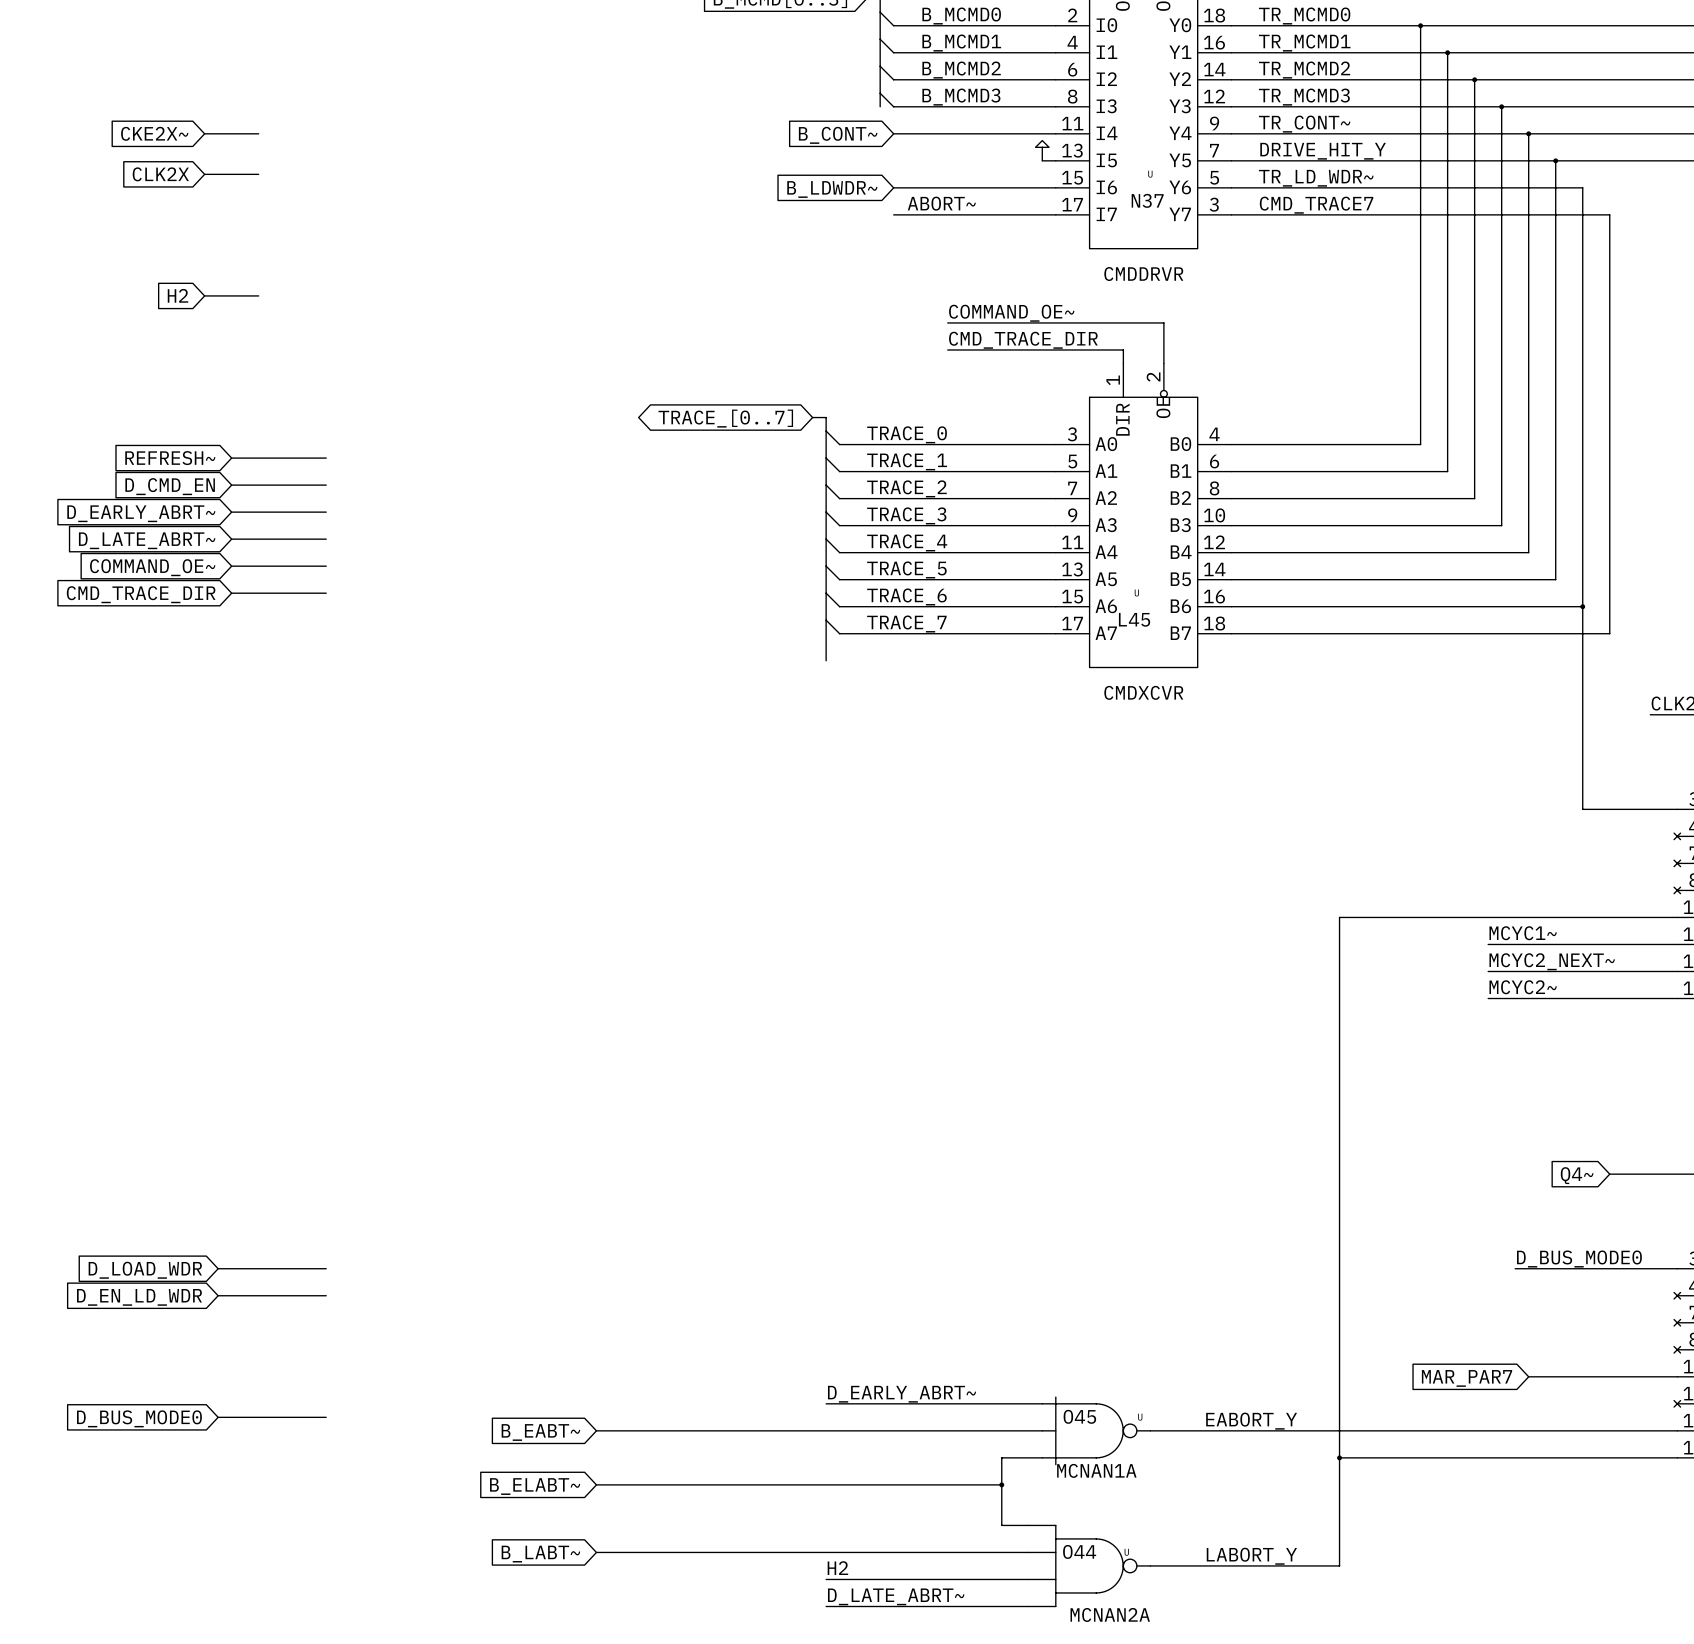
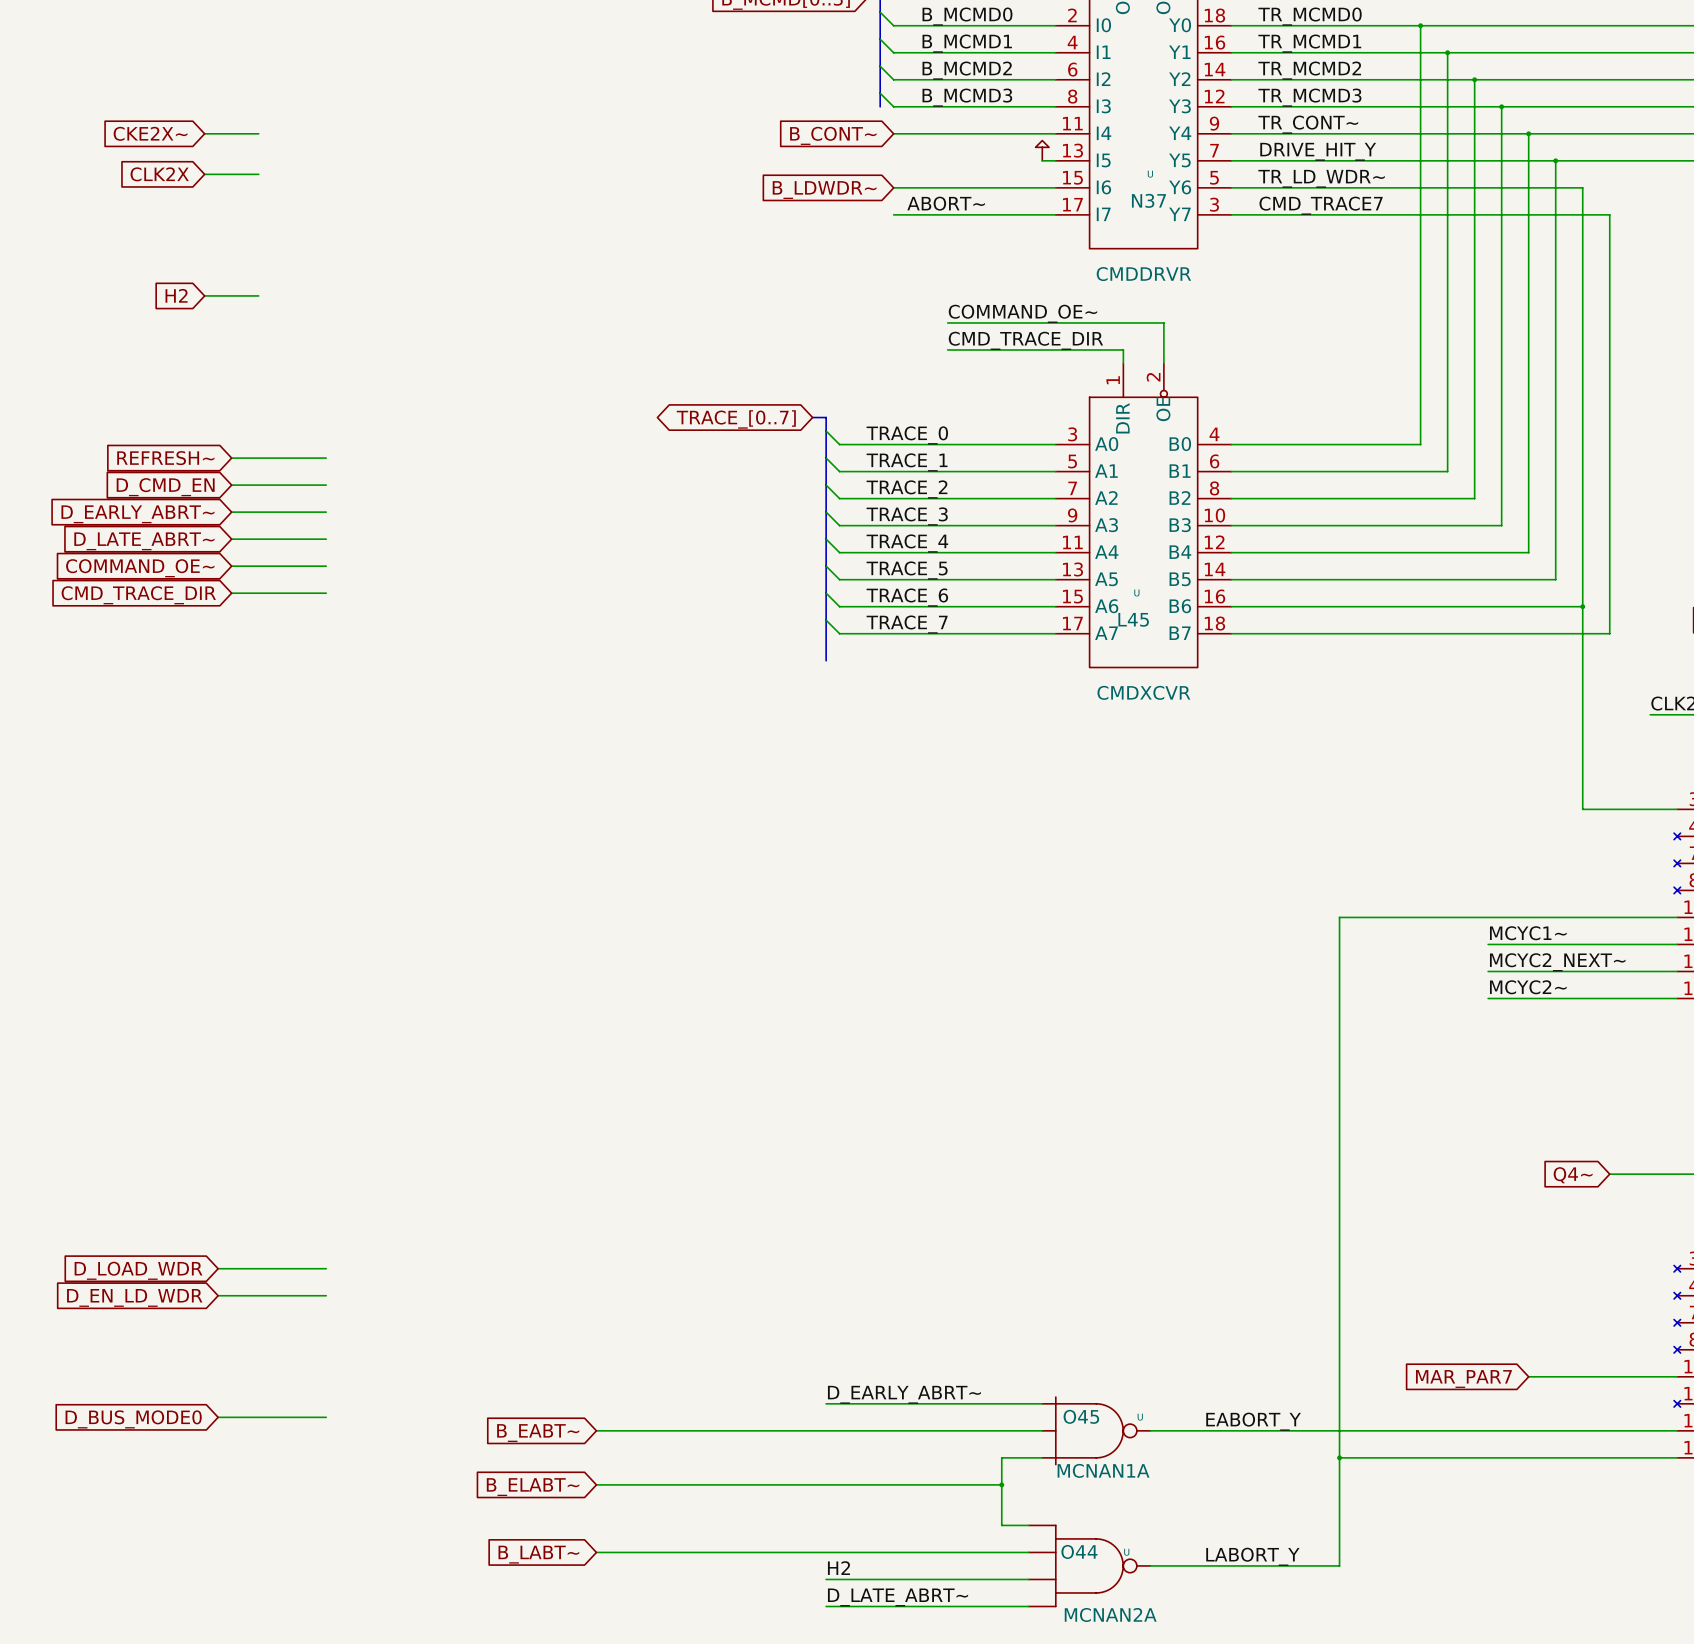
label: D_BUS_MODE0 (1579, 1259) -> none
wire: (1515, 1268) (1677, 1268) -> none
no-connect mark: none -> (1677, 1268)

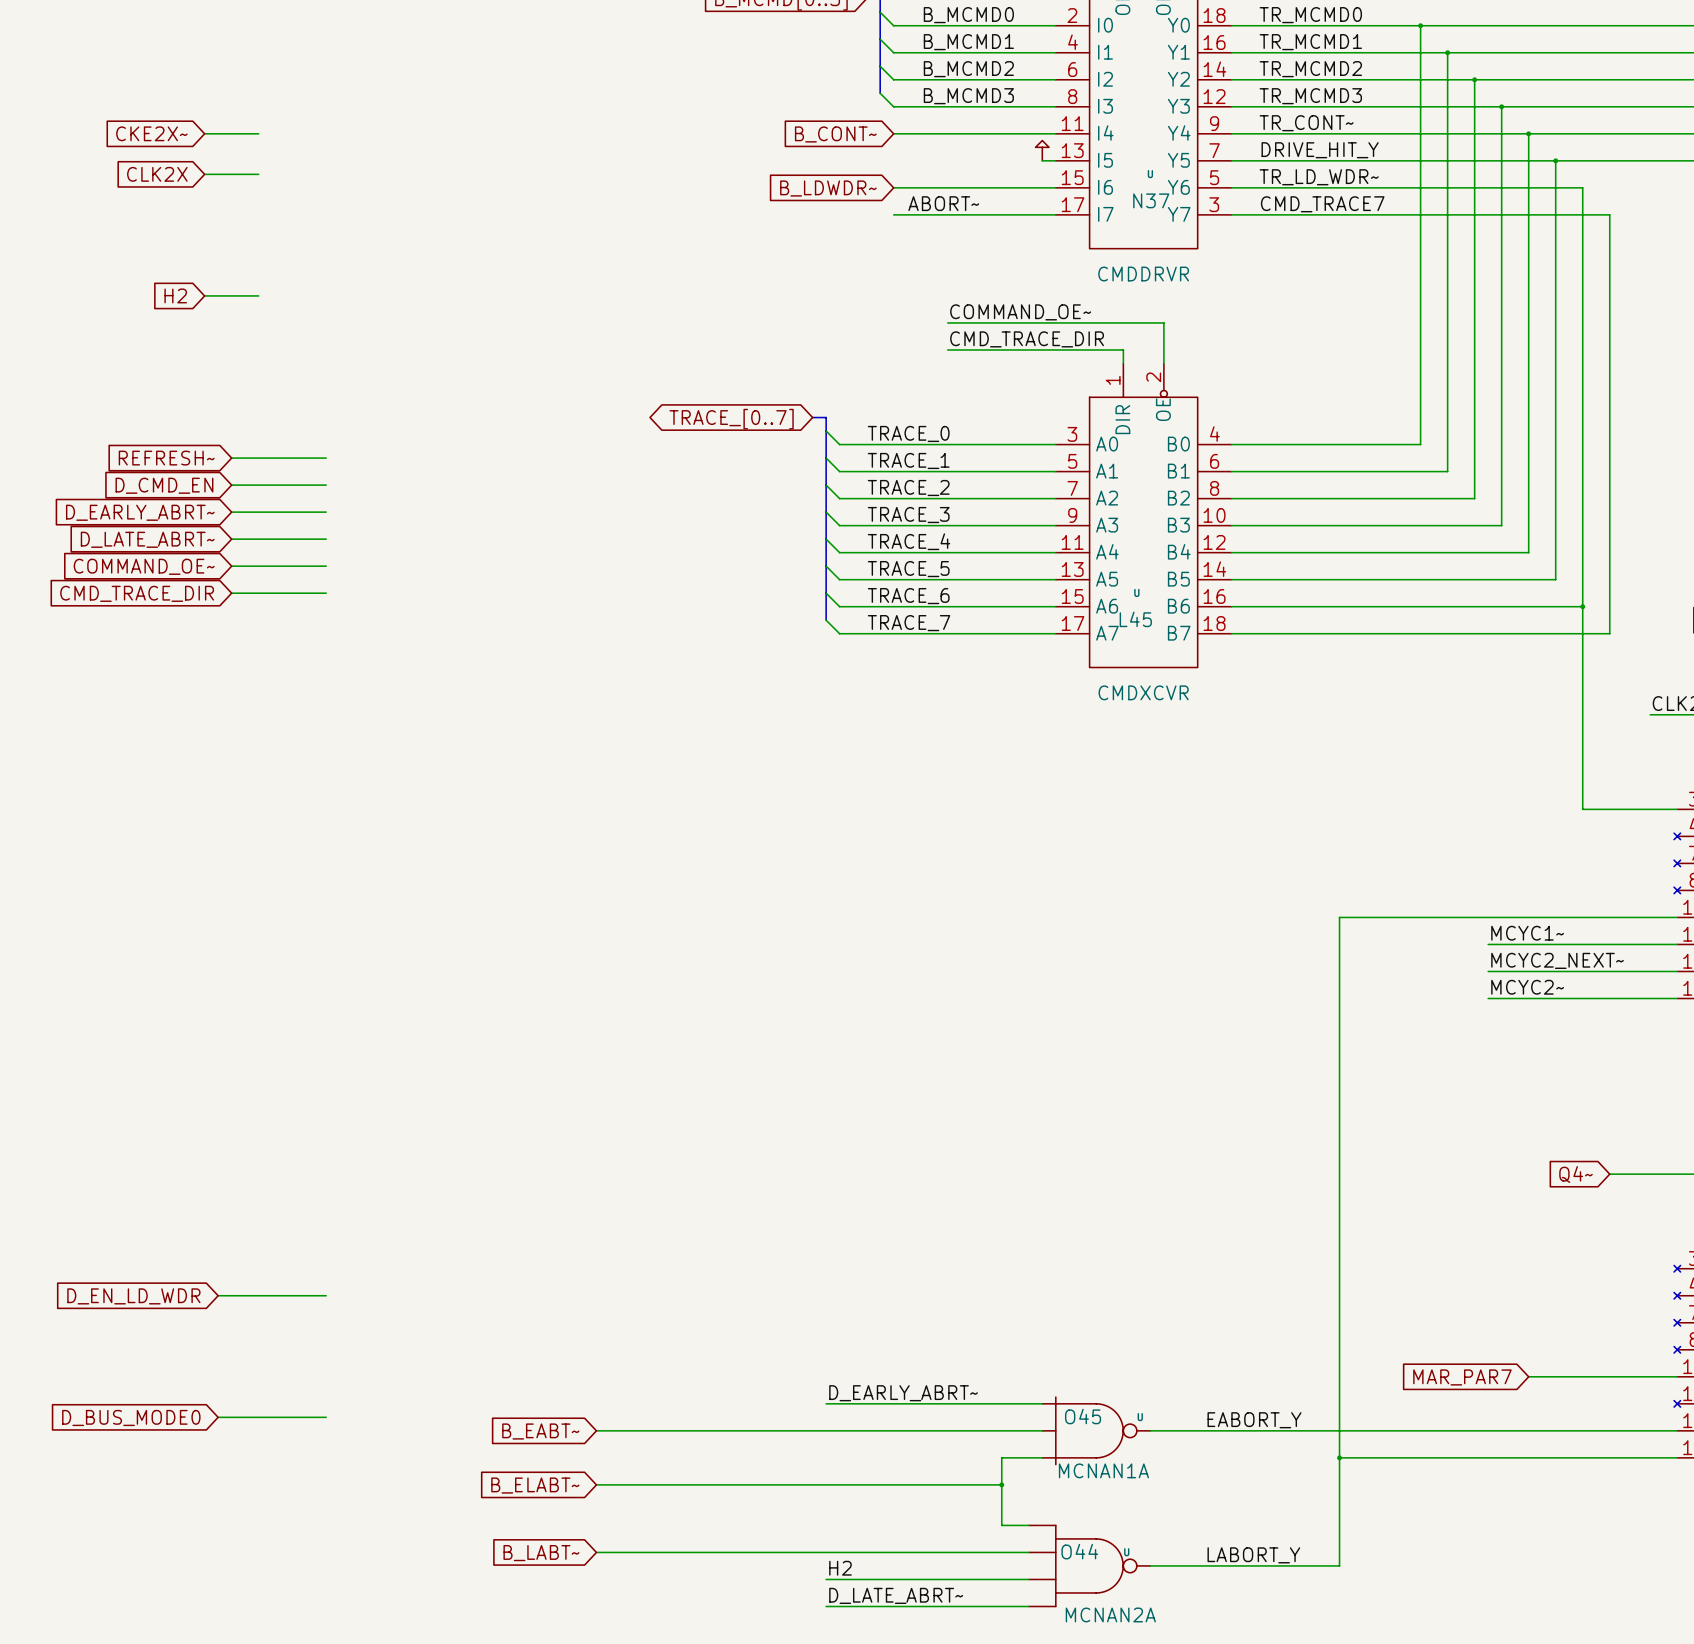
bus: (880, 93) (880, 106) -> none
bus: (826, 620) (826, 660) -> none
wire: (218, 1268) (326, 1268) -> none
global label: D_LOAD_WDR (138, 1270) -> none

